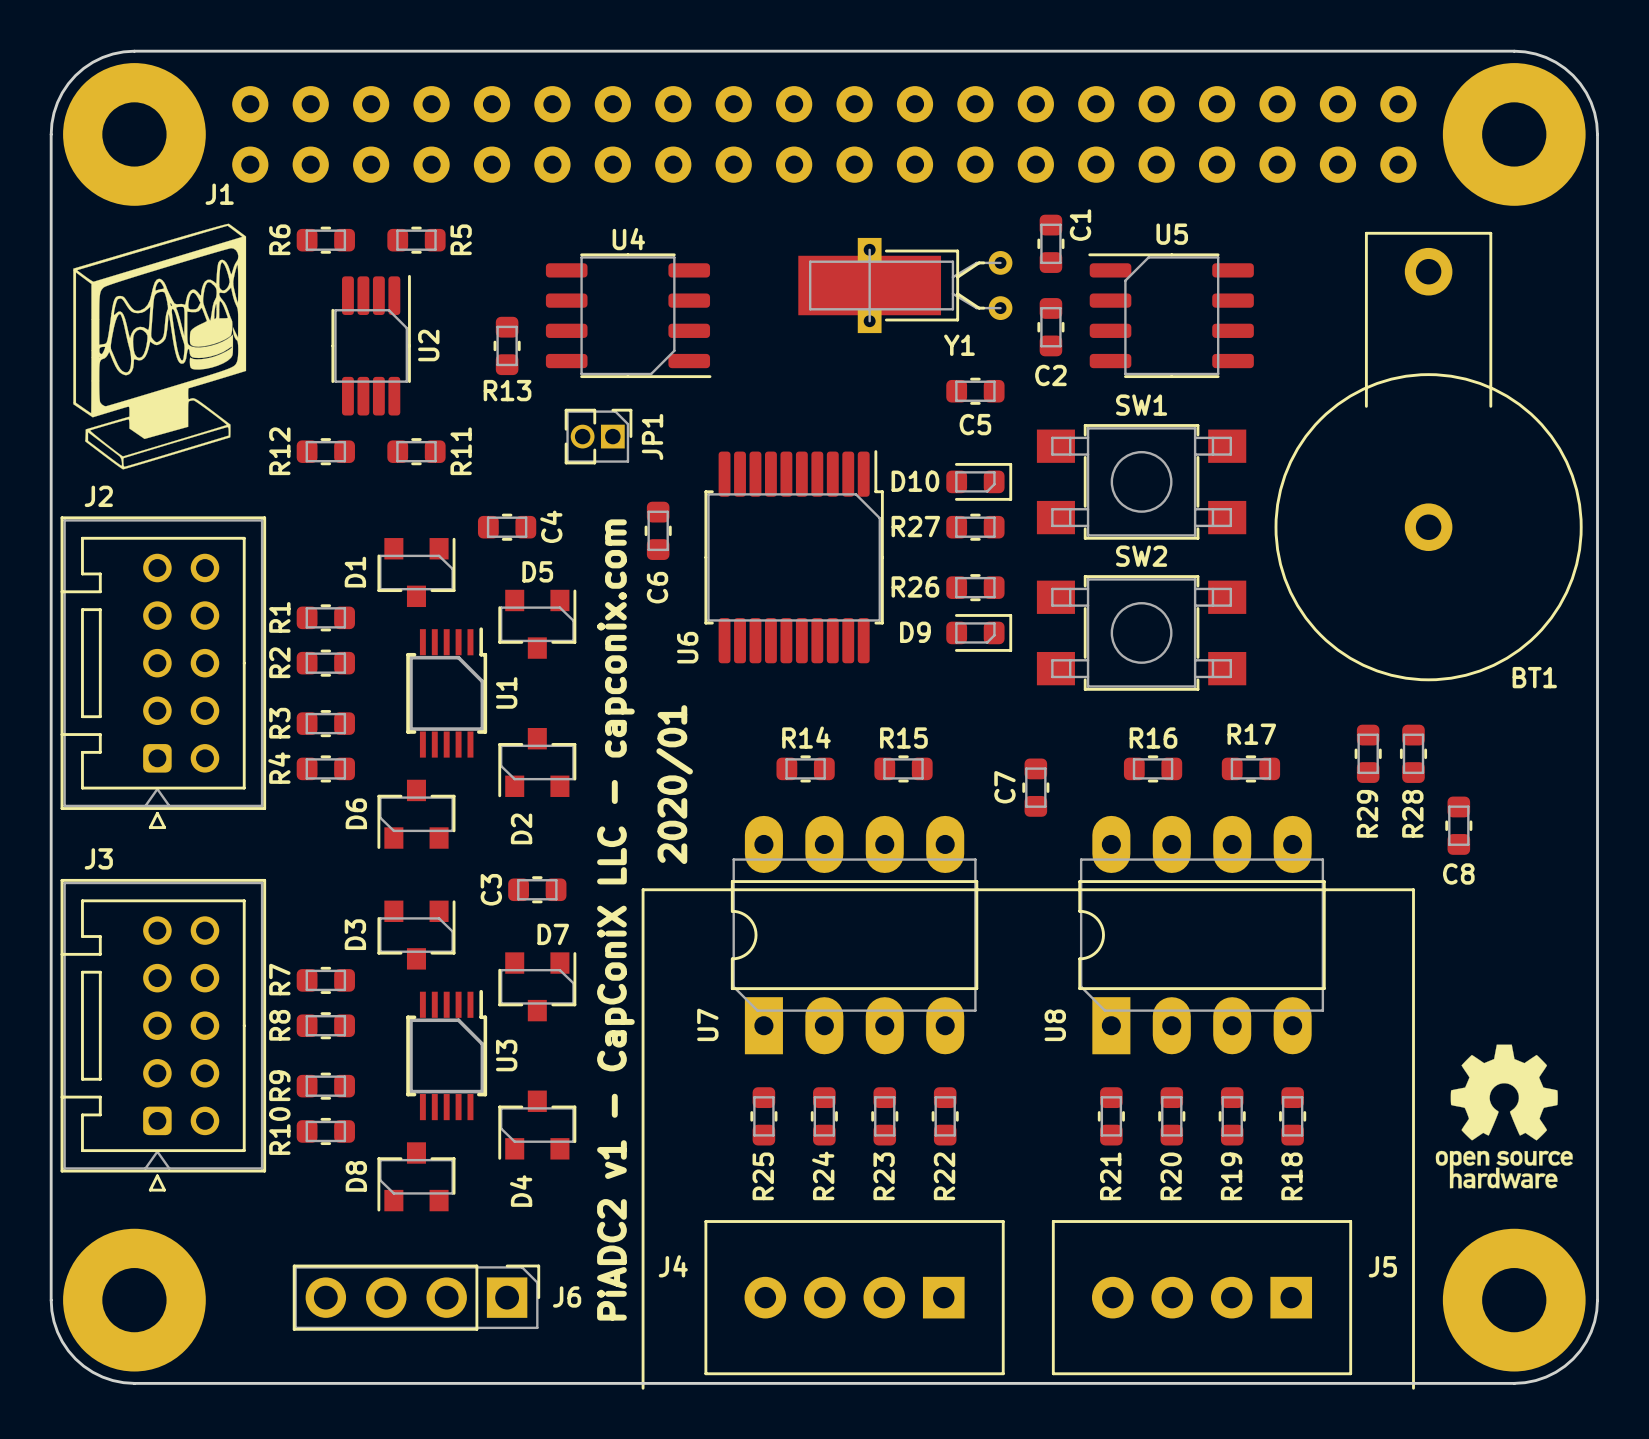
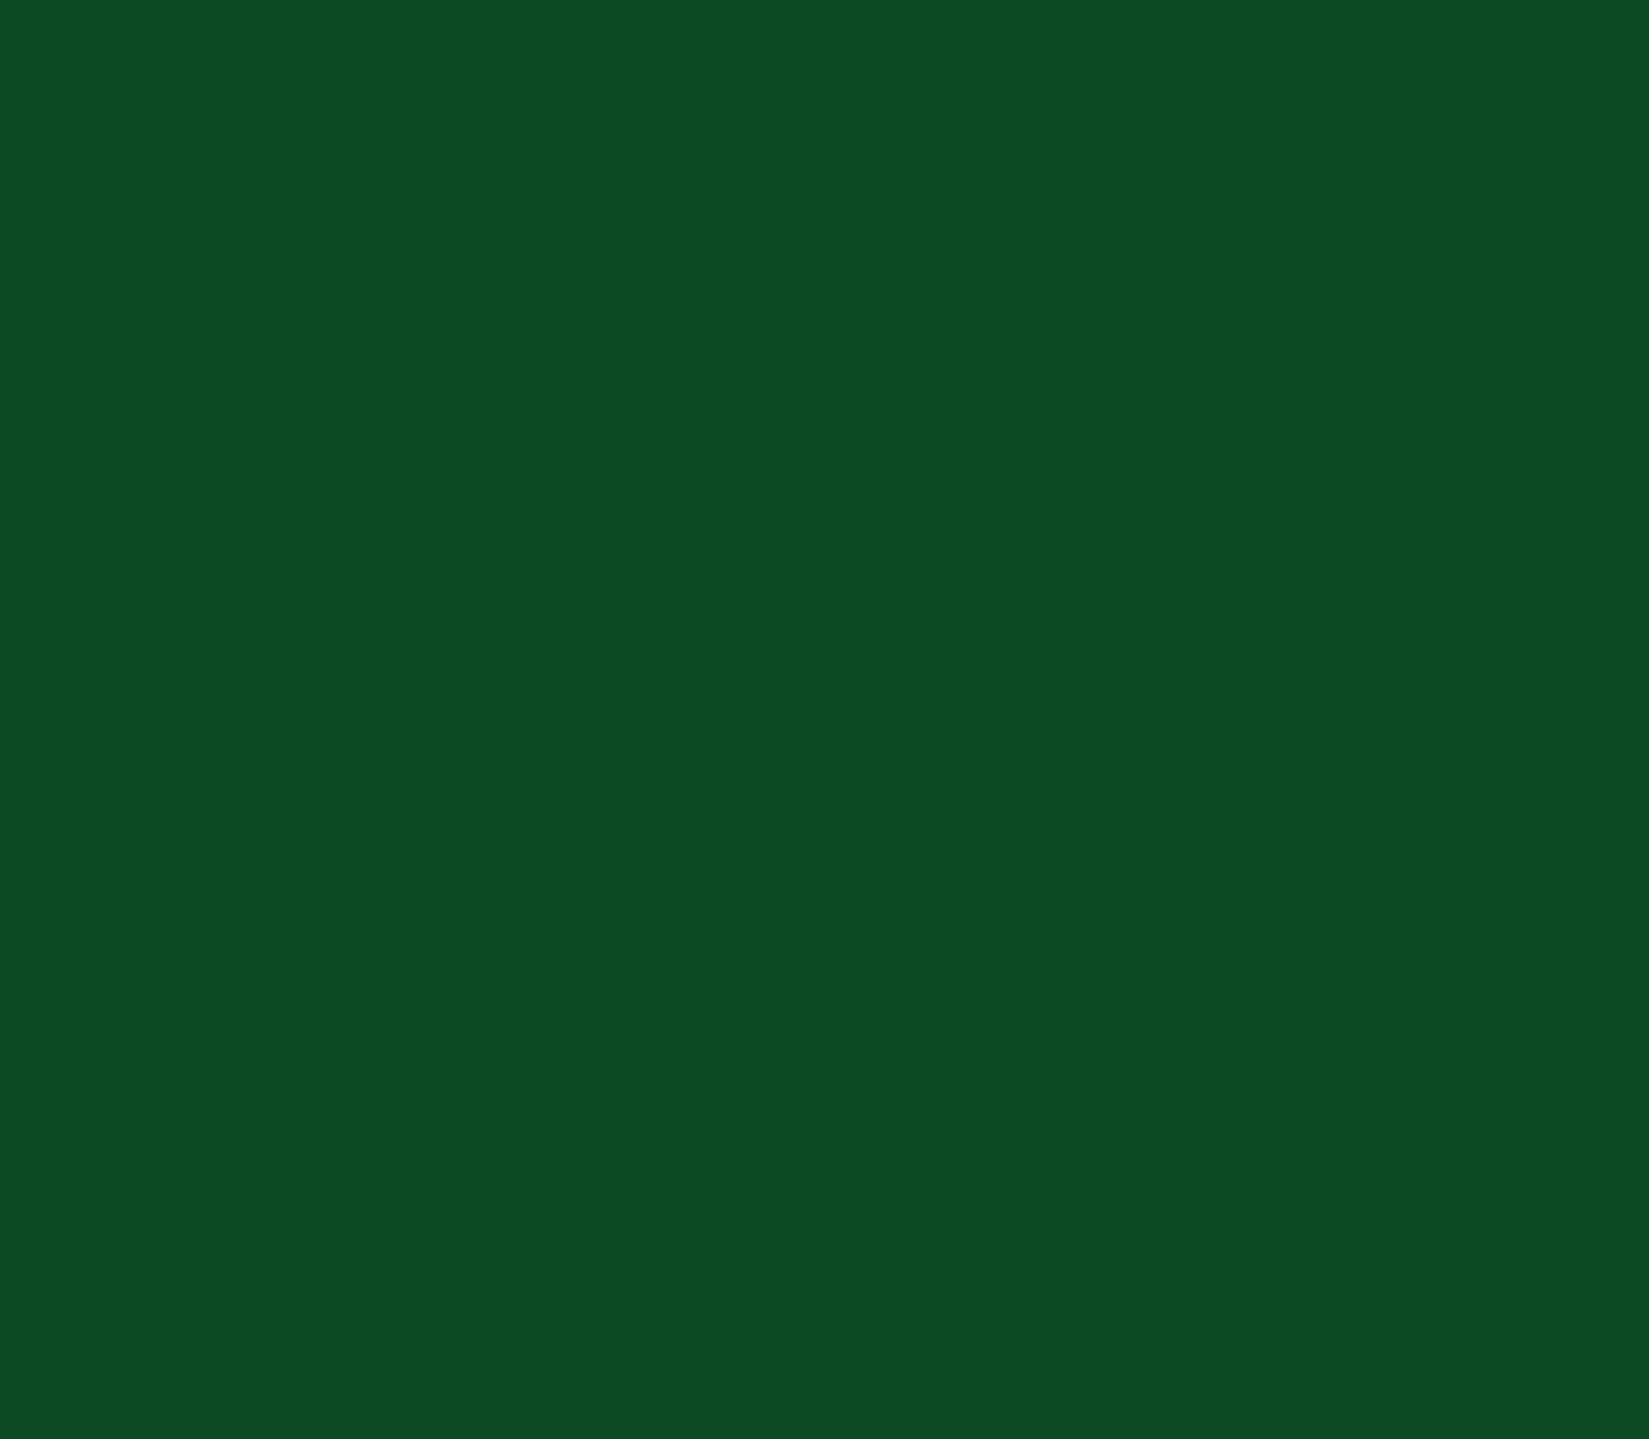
drawing: [73, 223, 247, 470] -> none
R6: (325, 240) -> none
R5: (416, 240) -> none
C1: (1050, 243) -> none
Y1: (905, 285) -> none
U4: (628, 315) -> none
U5: (1171, 315) -> none
C2: (1050, 327) -> none
U2: (371, 345) -> none
R13: (507, 345) -> none
C5: (975, 391) -> none
JP1: (598, 436) -> none
R12: (325, 451) -> none
R11: (416, 451) -> none
BT1: (1428, 456) -> none
D10: (979, 481) -> none
SW1: (1141, 481) -> none
C4: (507, 527) -> none
R27: (975, 527) -> none
C6: (658, 530) -> none
U6: (794, 556) -> none
D1: (416, 572) -> none
R26: (975, 587) -> none
R1: (325, 617) -> none
D5: (537, 624) -> none
D9: (979, 632) -> none
SW2: (1141, 632) -> none
R2: (325, 663) -> none
J2: (163, 672) -> none
U1: (446, 692) -> none
J1: (824, 717) -> none
R3: (325, 723) -> none
R29: (1368, 753) -> none
R28: (1413, 753) -> none
D2: (537, 762) -> none
R4: (325, 768) -> none
R14: (805, 768) -> none
R15: (903, 768) -> none
R16: (1153, 768) -> none
R17: (1250, 768) -> none
text: 2020/01 (674, 784) -> none
C7: (1035, 787) -> none
D6: (416, 814) -> none
C8: (1458, 825) -> none
C3: (537, 889) -> none
text: PiADC2 v1 - CapConiX LLC - capconix.com (615, 919) -> none
D3: (416, 934) -> none
U7: (854, 935) -> none
U8: (1202, 935) -> none
R7: (325, 980) -> none
D7: (537, 986) -> none
R8: (325, 1025) -> none
J3: (163, 1035) -> none
drawing: [1435, 1044, 1573, 1189] -> none
U3: (446, 1055) -> none
R9: (325, 1086) -> none
R25: (763, 1116) -> none
R24: (824, 1116) -> none
R23: (884, 1116) -> none
R22: (945, 1116) -> none
R21: (1111, 1116) -> none
R20: (1171, 1116) -> none
R19: (1232, 1116) -> none
R18: (1292, 1116) -> none
D4: (537, 1125) -> none
R10: (325, 1131) -> none
D8: (416, 1176) -> none
J6: (416, 1297) -> none
J4: (854, 1297) -> none
J5: (1202, 1297) -> none
line: (643, 1388) (643, 889) (1413, 889) (1413, 1388) -> none

